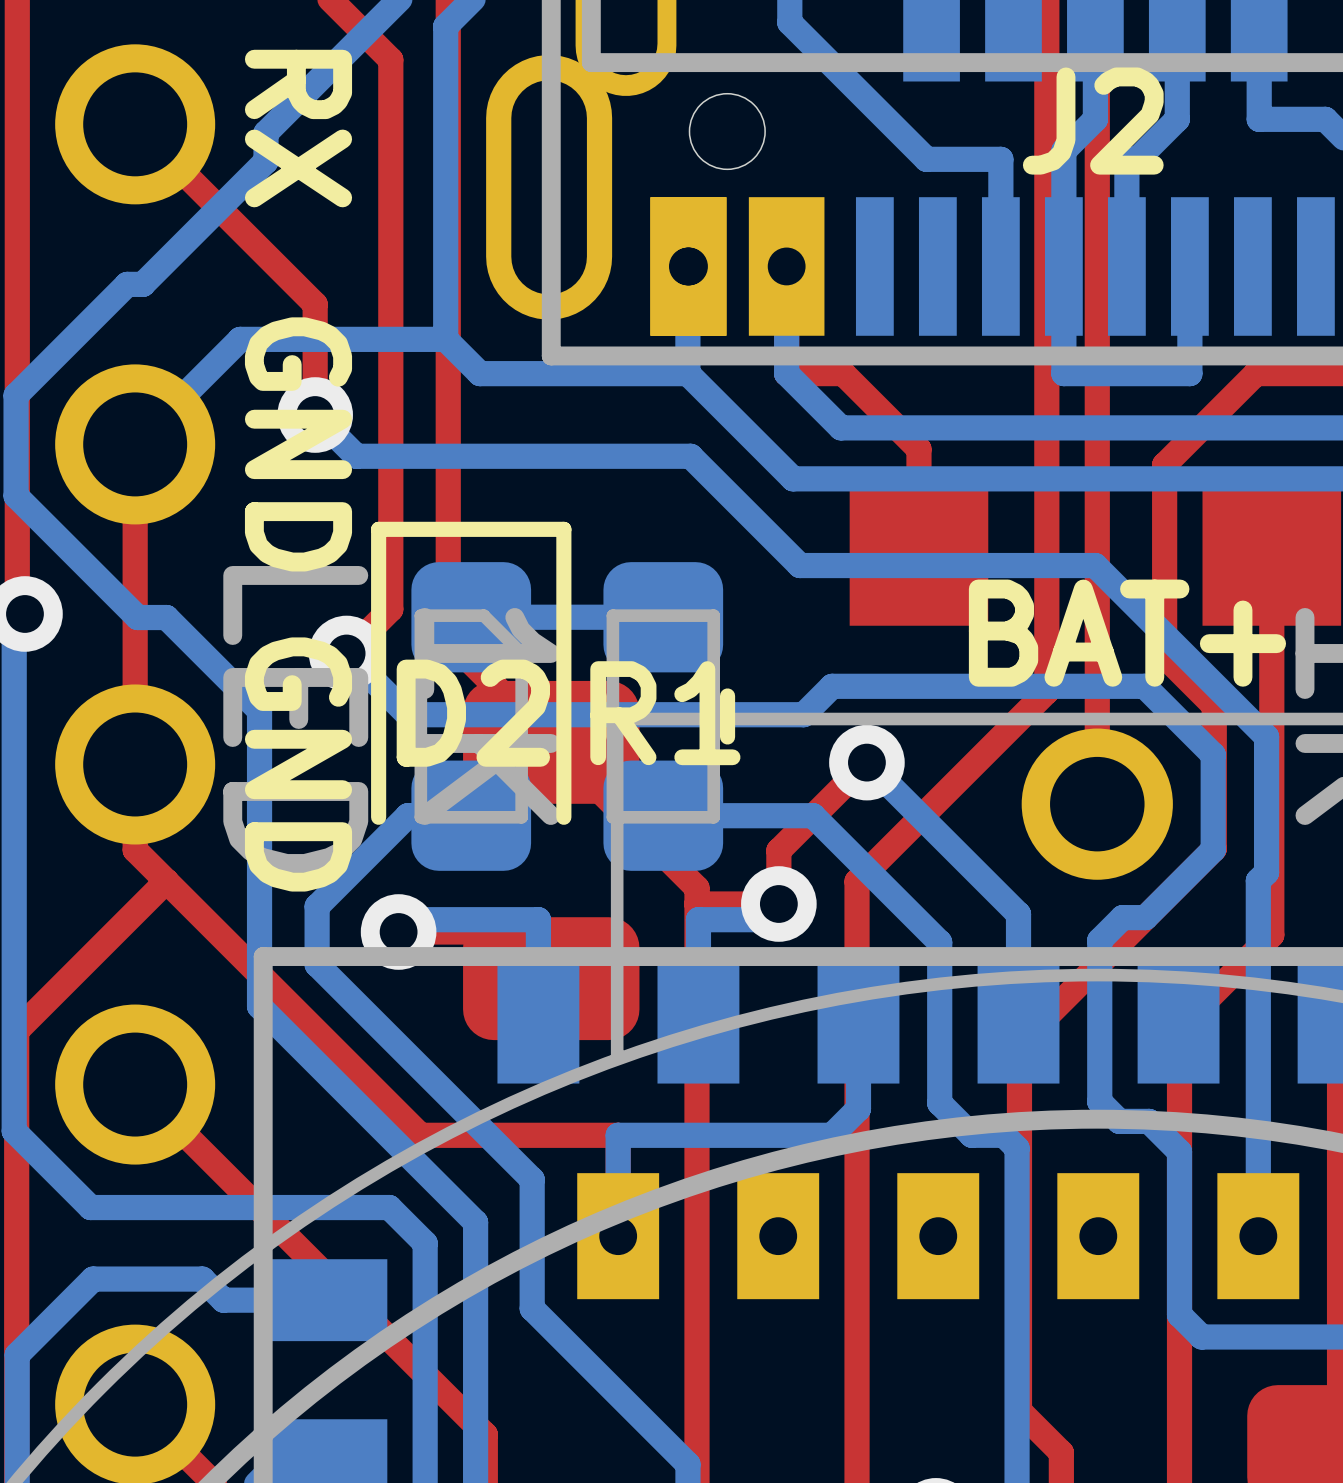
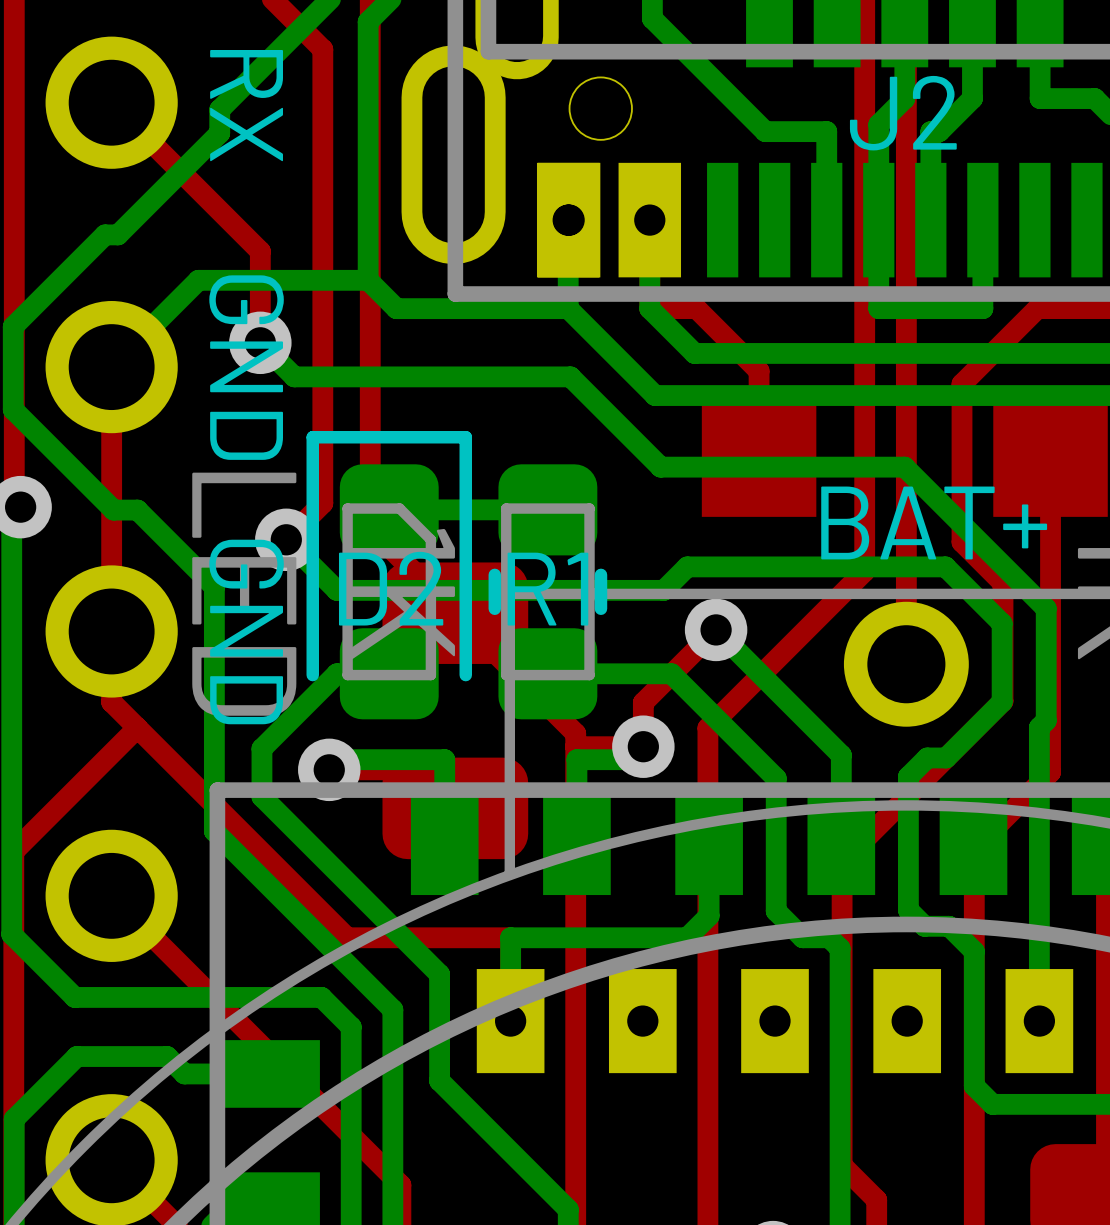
J2 name position: J2 (1093, 121) -> J2 (903, 113)

